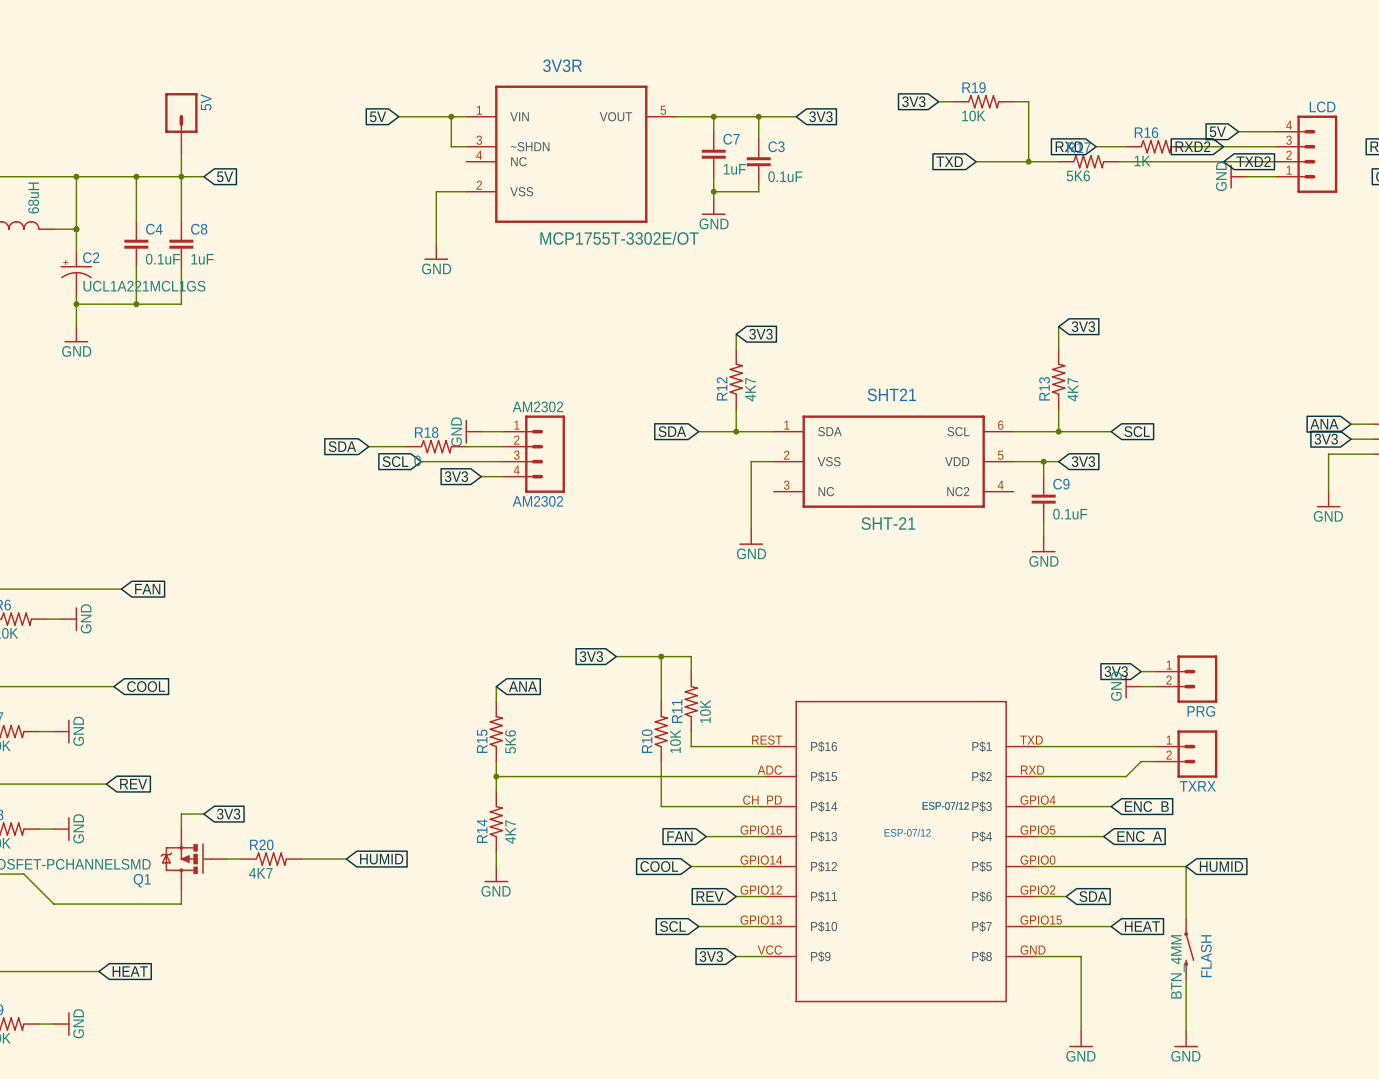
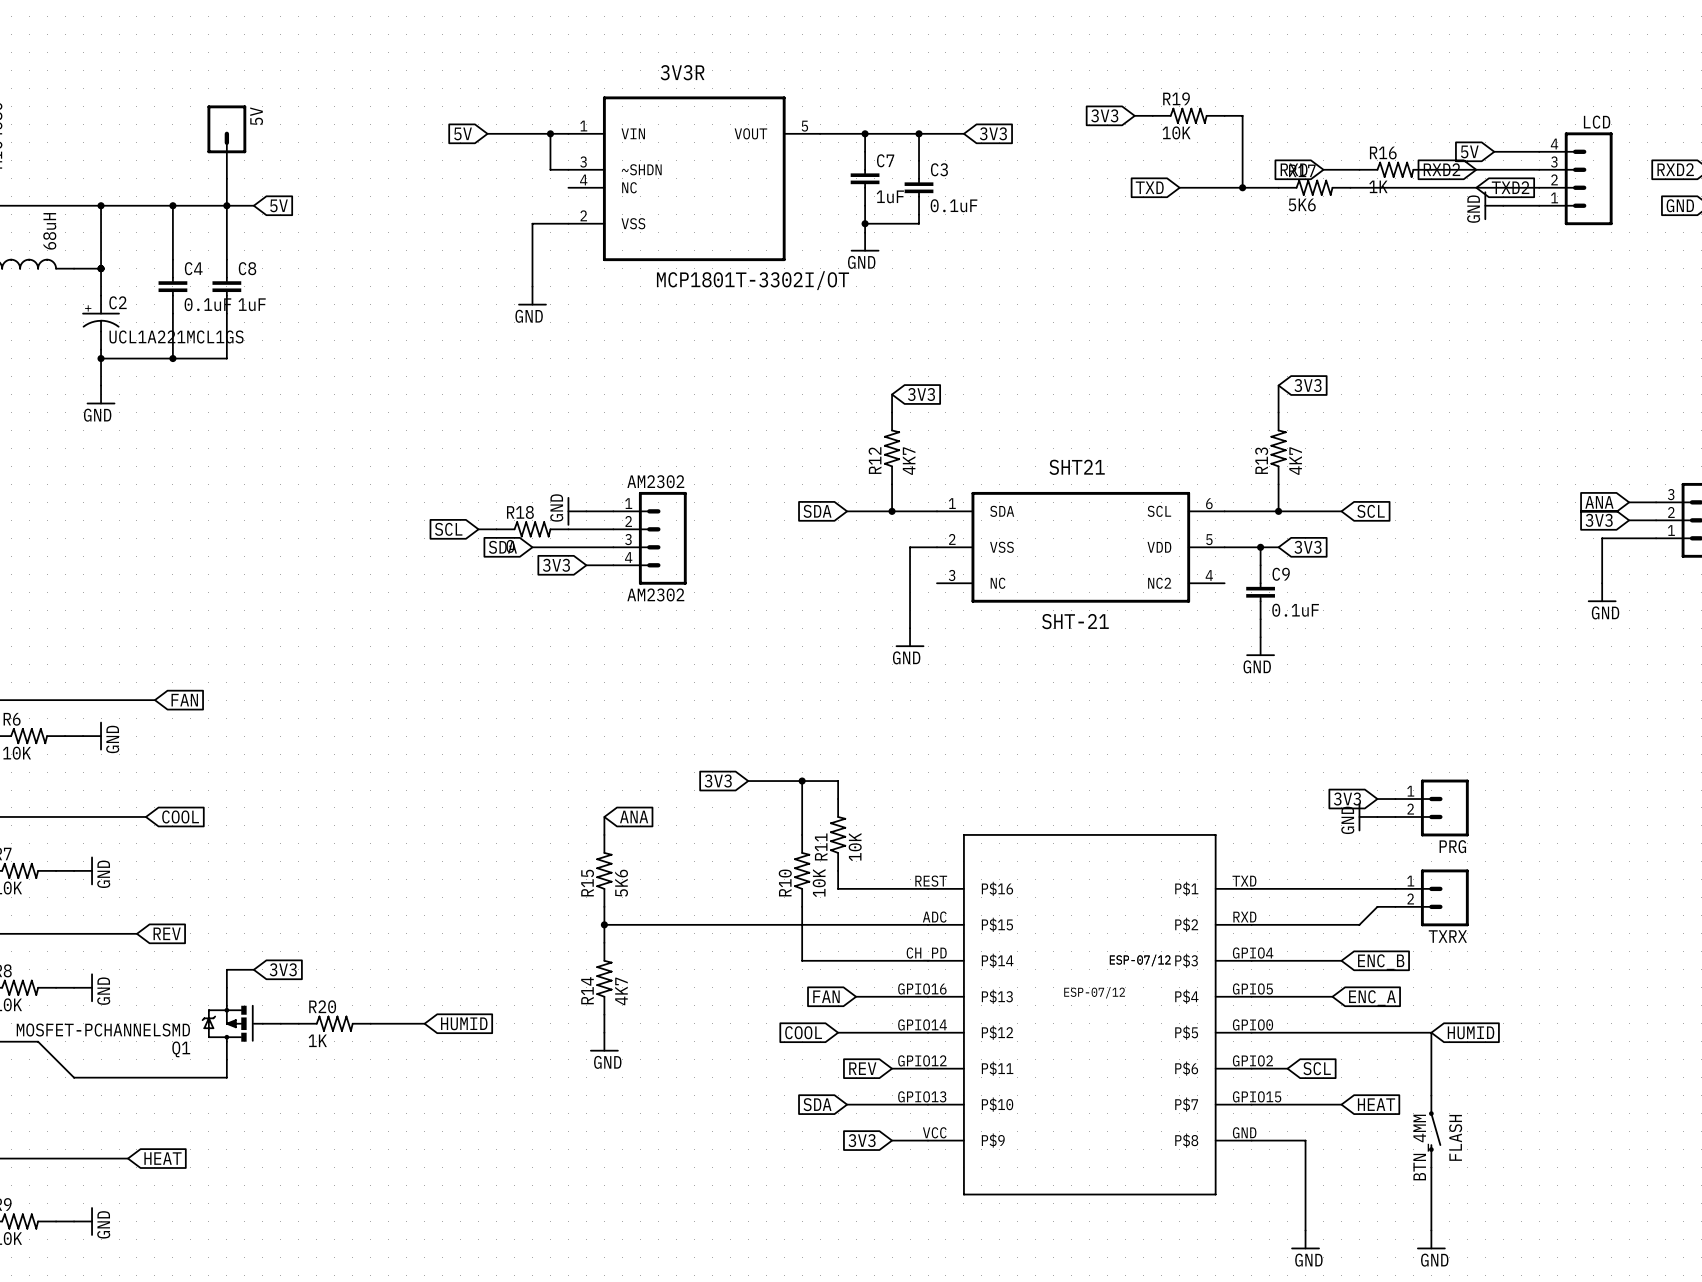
3V3R value: MCP1755T-3302E/OT (619, 238) -> MCP1801T-3302I/OT (752, 280)
global label position: SDA (342, 446) -> SDA (502, 547)
wire: (368, 446) (391, 446) -> none
global label position: SCL (395, 461) -> SCL (448, 529)
wire: (421, 461) (436, 461) -> none
R20 value: 4K7 (260, 873) -> 1K (317, 1040)
global label: SDA (1093, 896) -> SCL (1317, 1068)
global label: SCL (672, 926) -> SDA (817, 1104)

